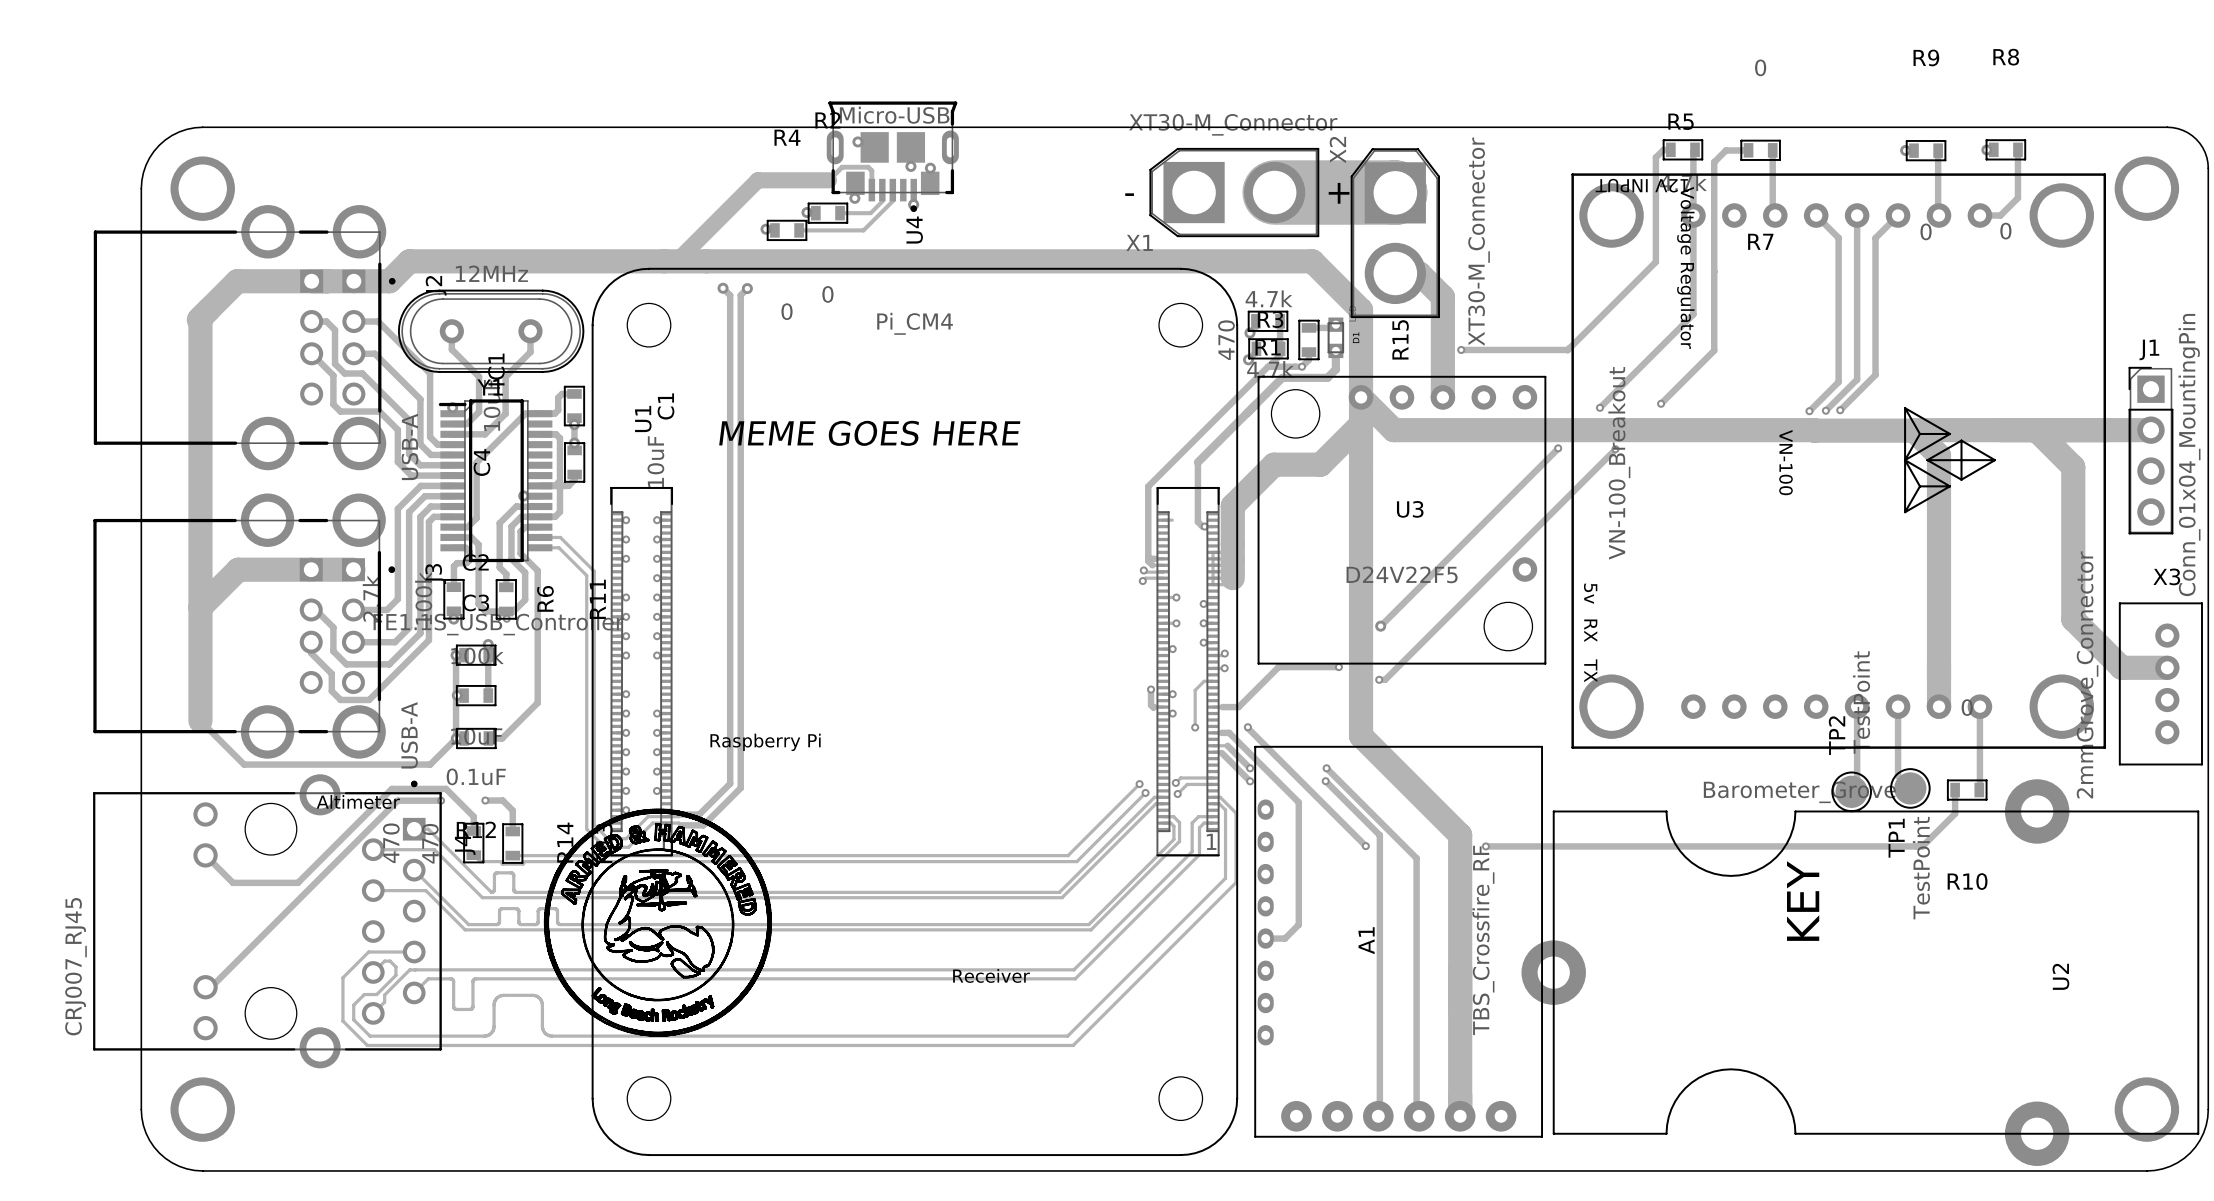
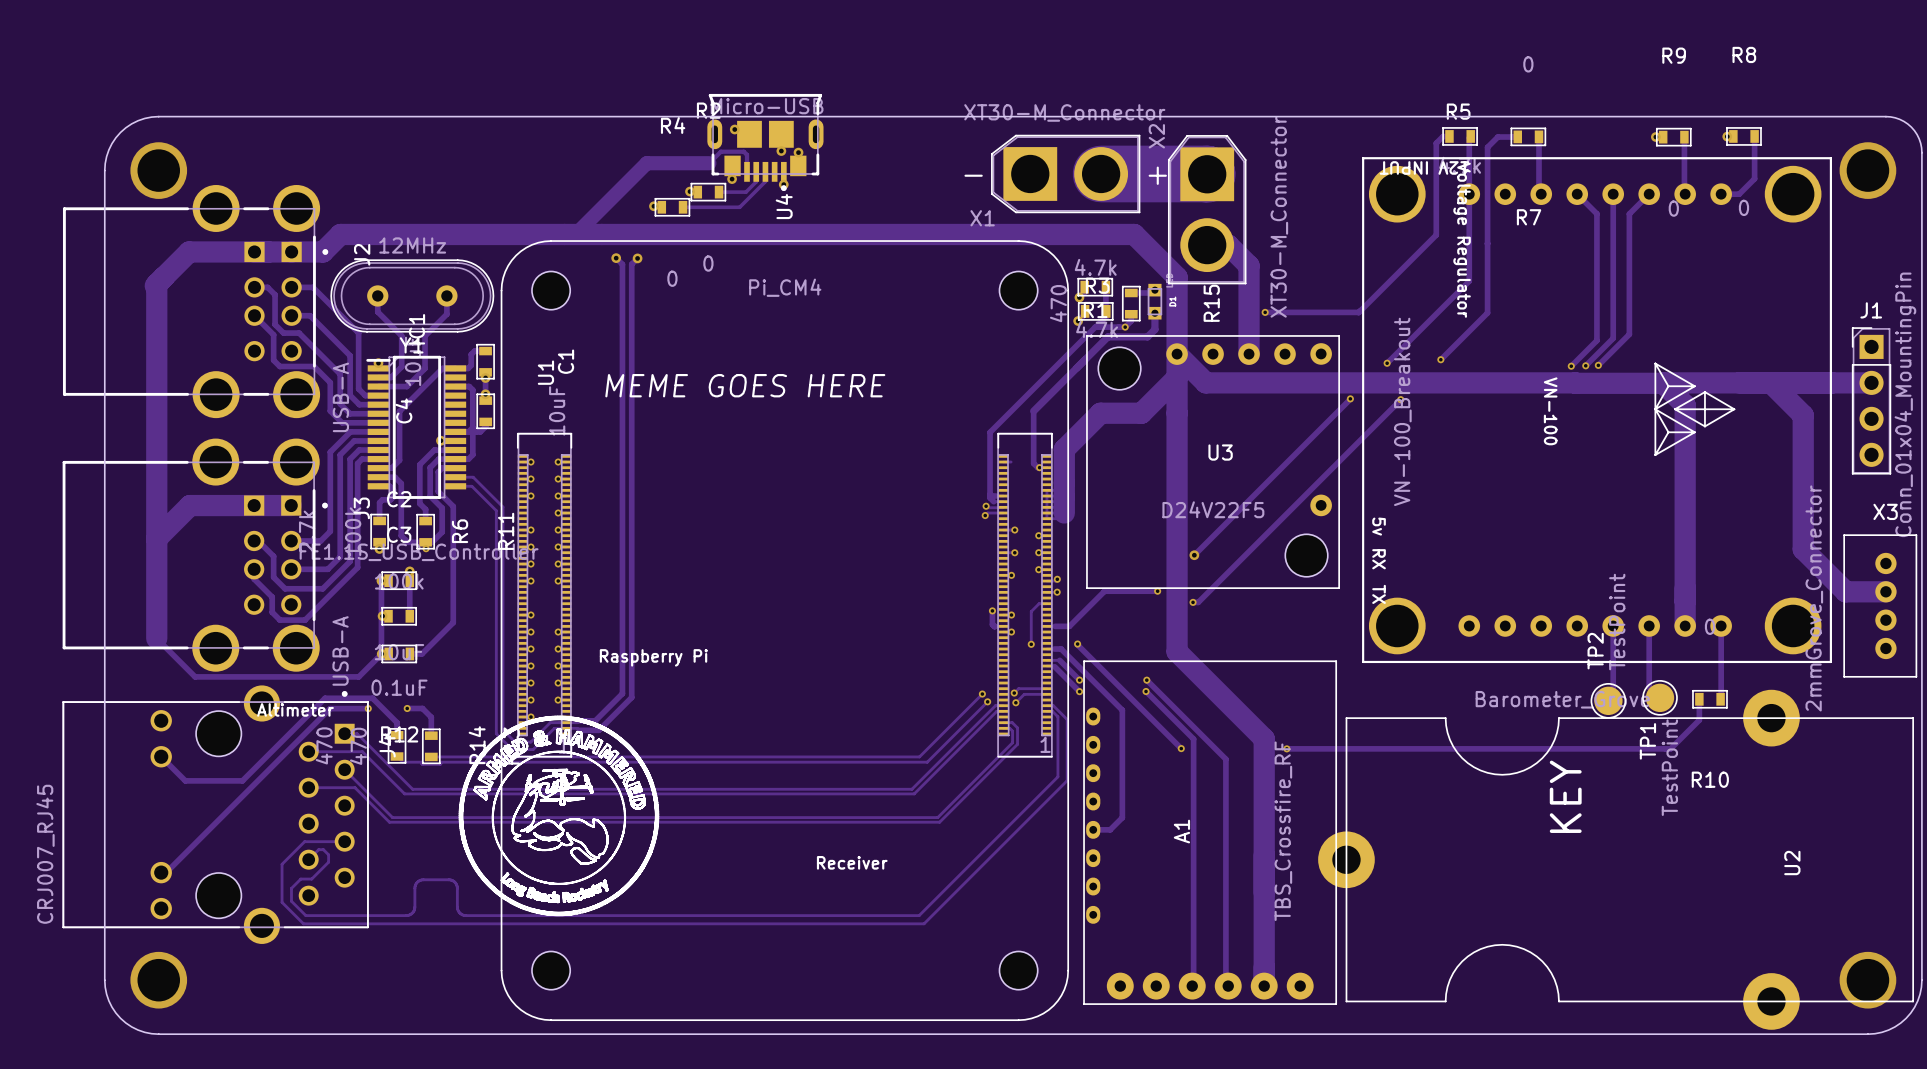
track: (1213, 816) (1198, 816) (1192, 823) (1192, 851) (1073, 969) (415, 969) -> none
track: (1213, 823) (1204, 823) (1199, 827) (1199, 854) (1075, 978) (475, 978) (473, 981) (472, 1006) (470, 1009) (453, 1007) (453, 981) (451, 978) (428, 978) (414, 992) -> none
track: (491, 892) (494, 890) (494, 875) (497, 872) (513, 873) (513, 890) (516, 892) -> (412, 789) (434, 789)
track: (496, 924) (499, 922) (499, 910) (502, 908) (517, 909) (518, 922) (521, 924) -> (417, 817) (439, 817)
track: (535, 924) (538, 922) (538, 910) (541, 908) (556, 909) (557, 922) (560, 924) -> (451, 817) (473, 817)
track: (415, 969) (409, 969) (384, 995) (384, 1002) (373, 1013) -> none

